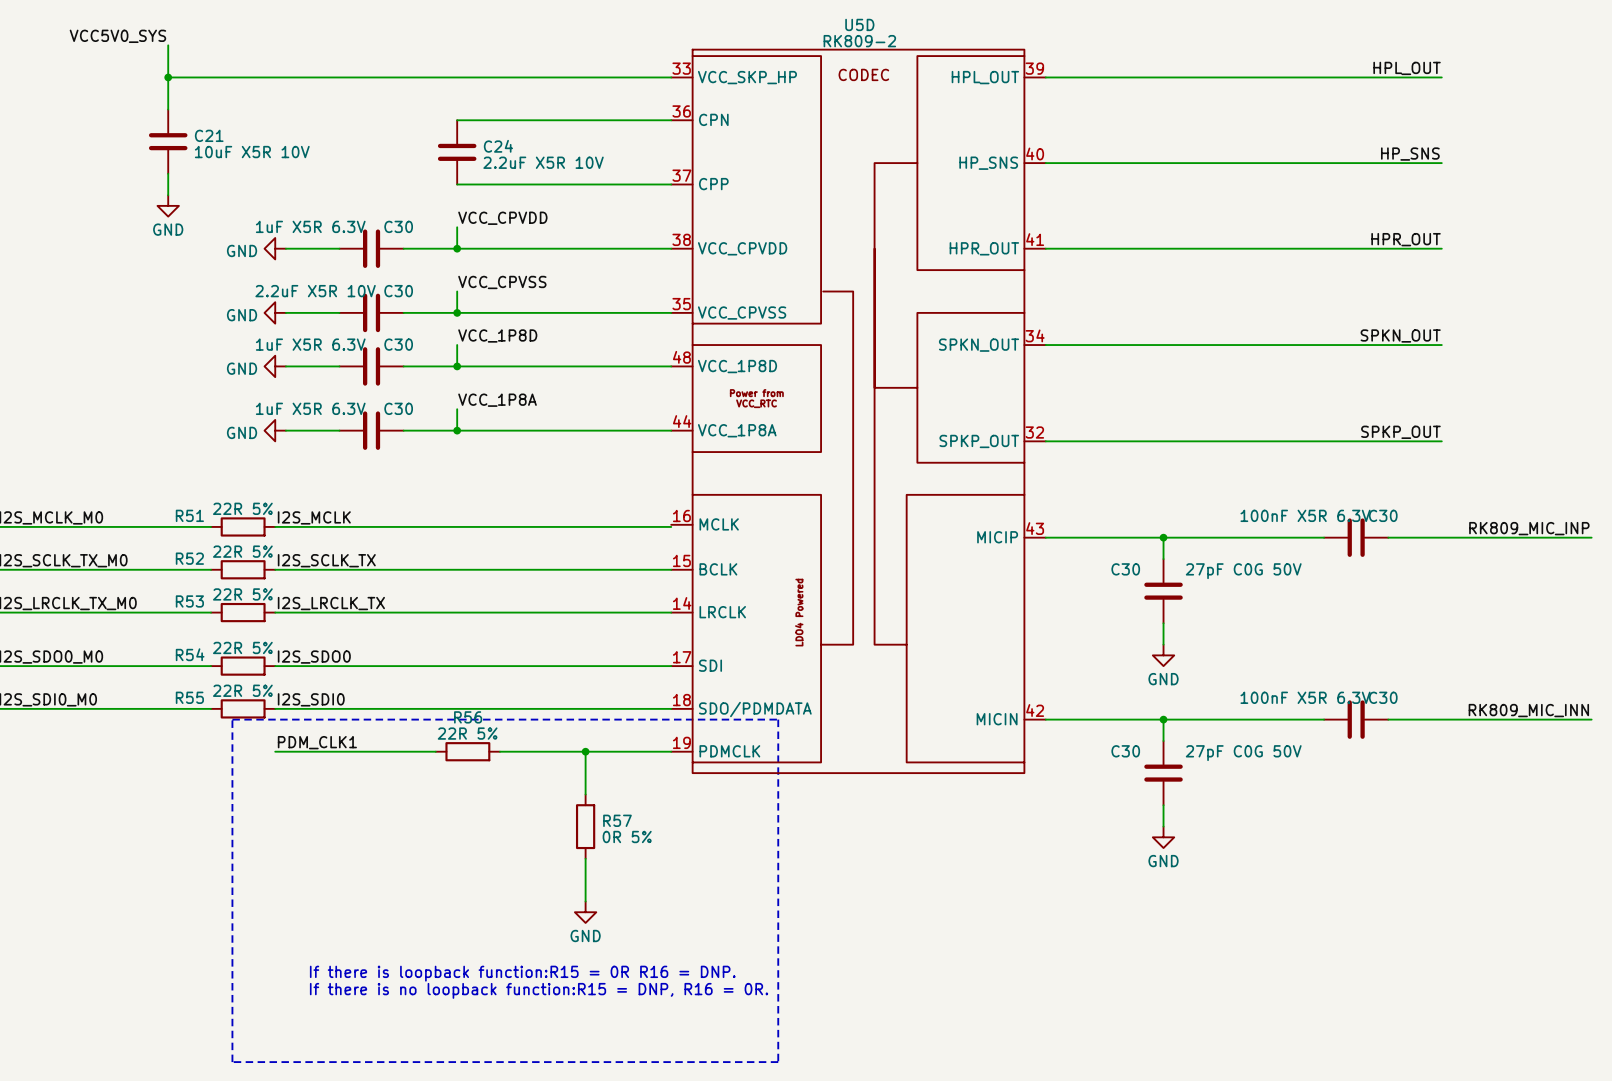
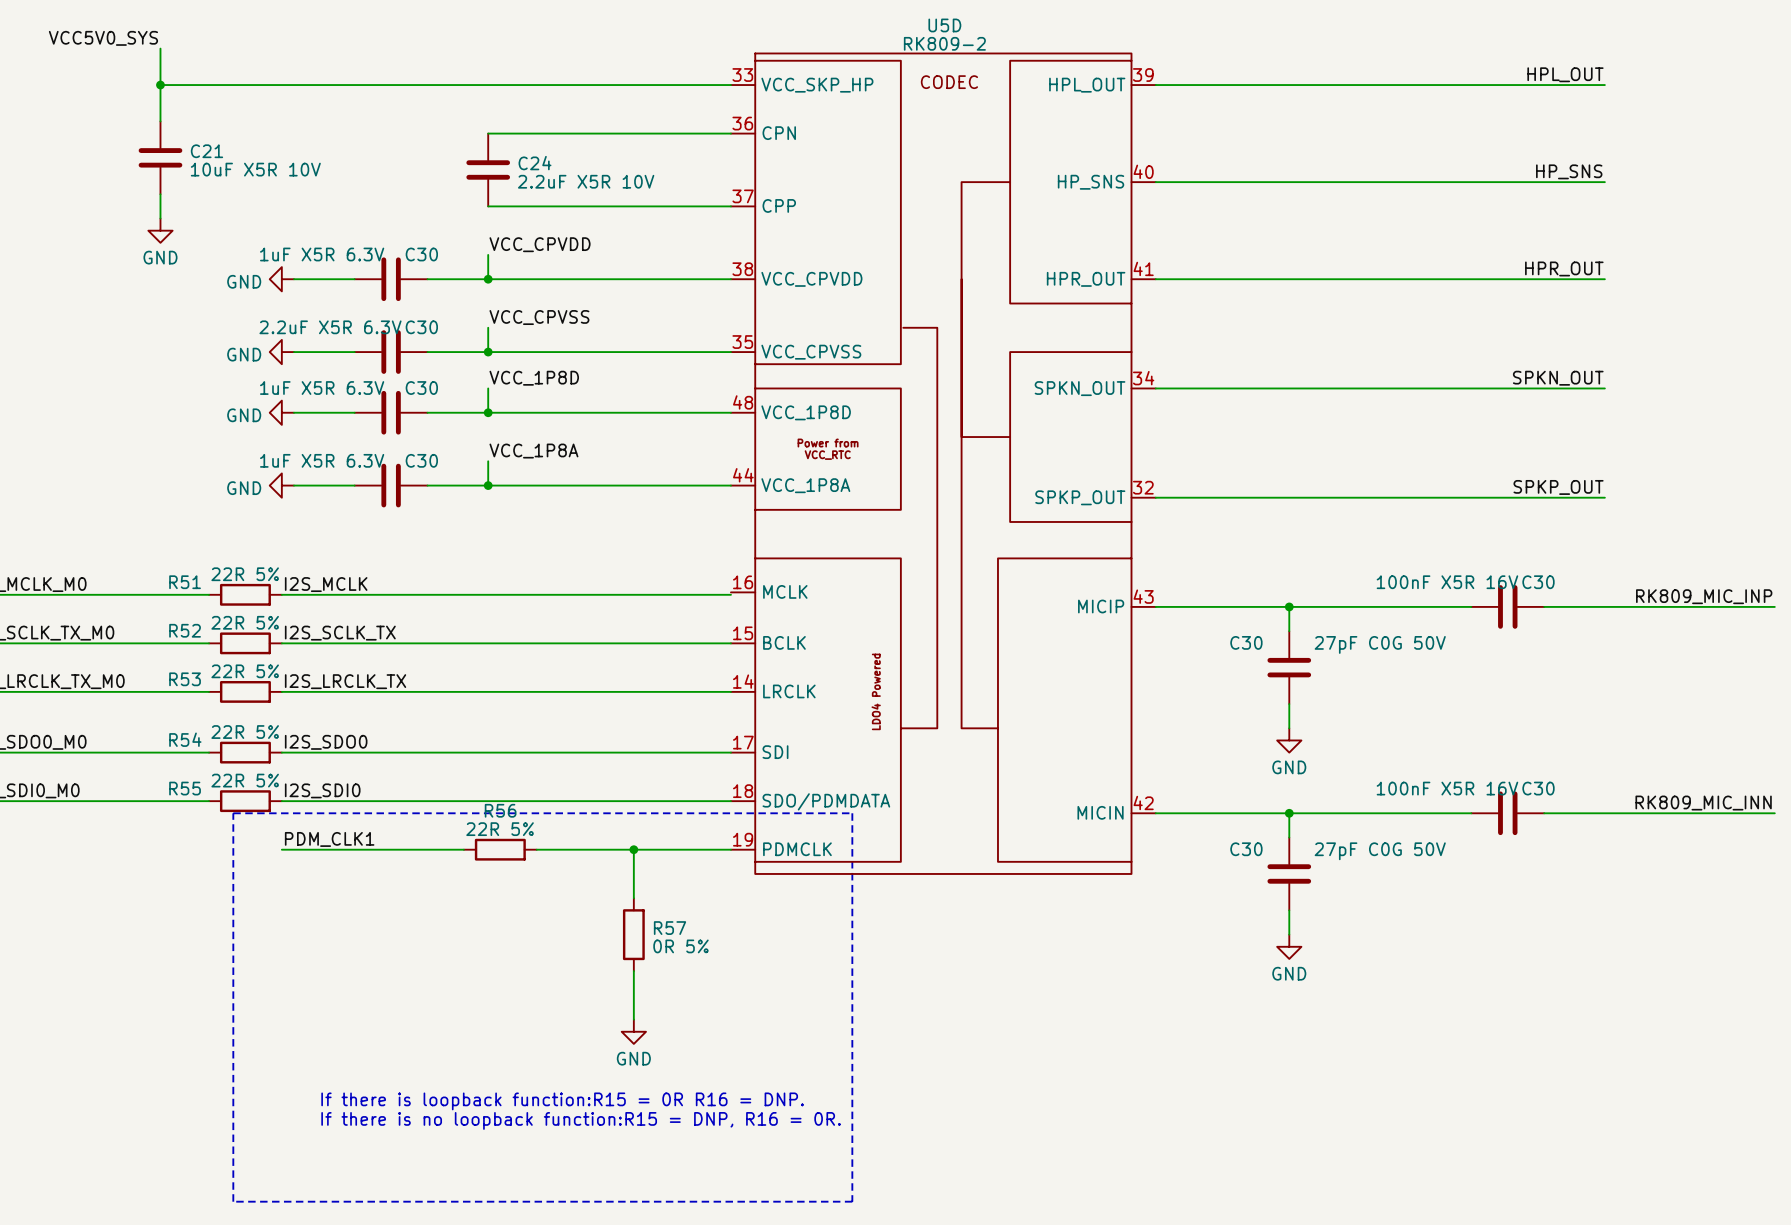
C30 value: 2.2uF X5R 10V (315, 291) -> 2.2uF X5R 6.3V (330, 327)
C30 value: 100nF X5R 6.3V (1305, 515) -> 100nF X5R 16V (1447, 582)
C30 value: 100nF X5R 6.3V (1305, 697) -> 100nF X5R 16V (1447, 788)

